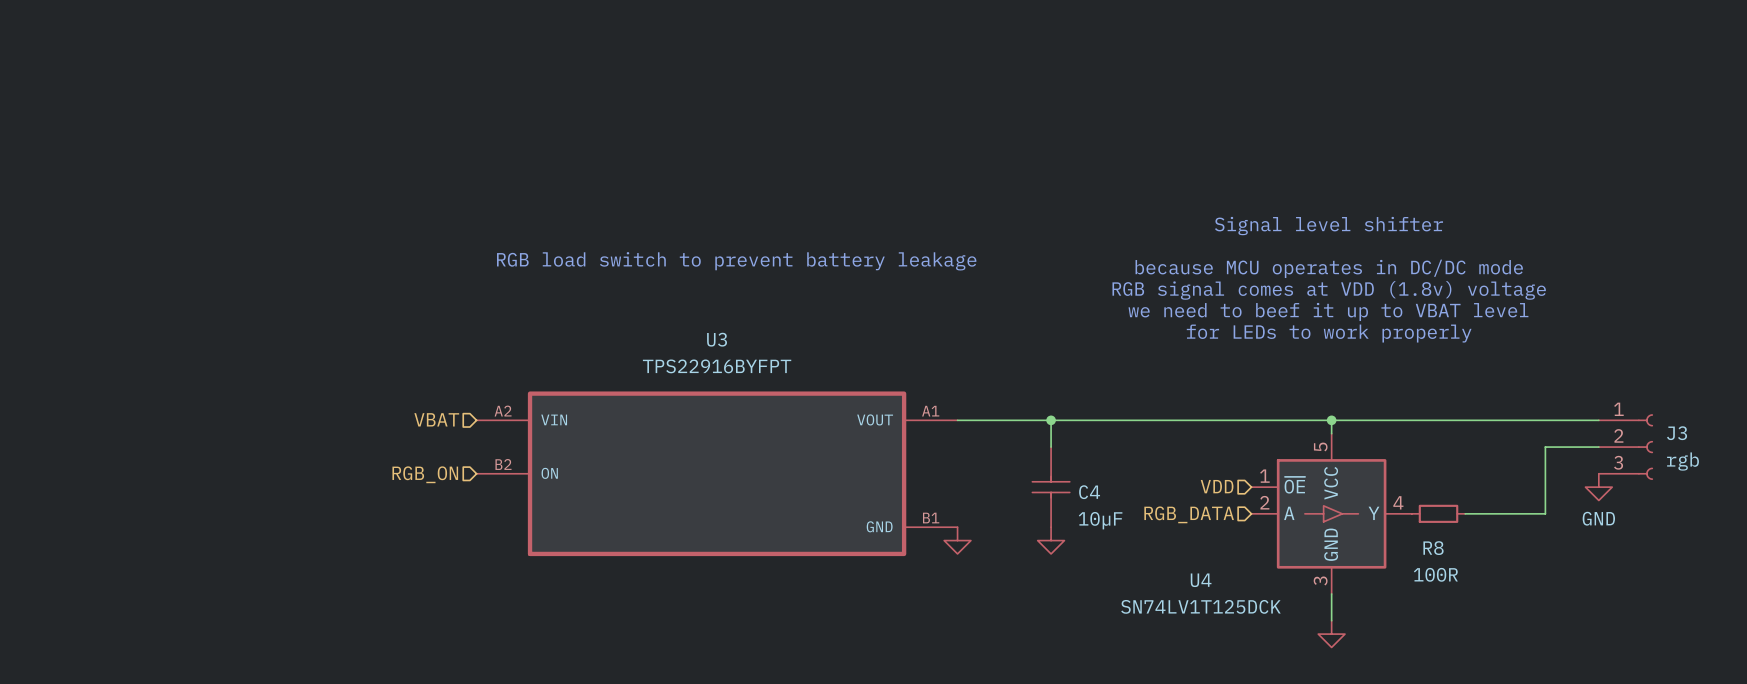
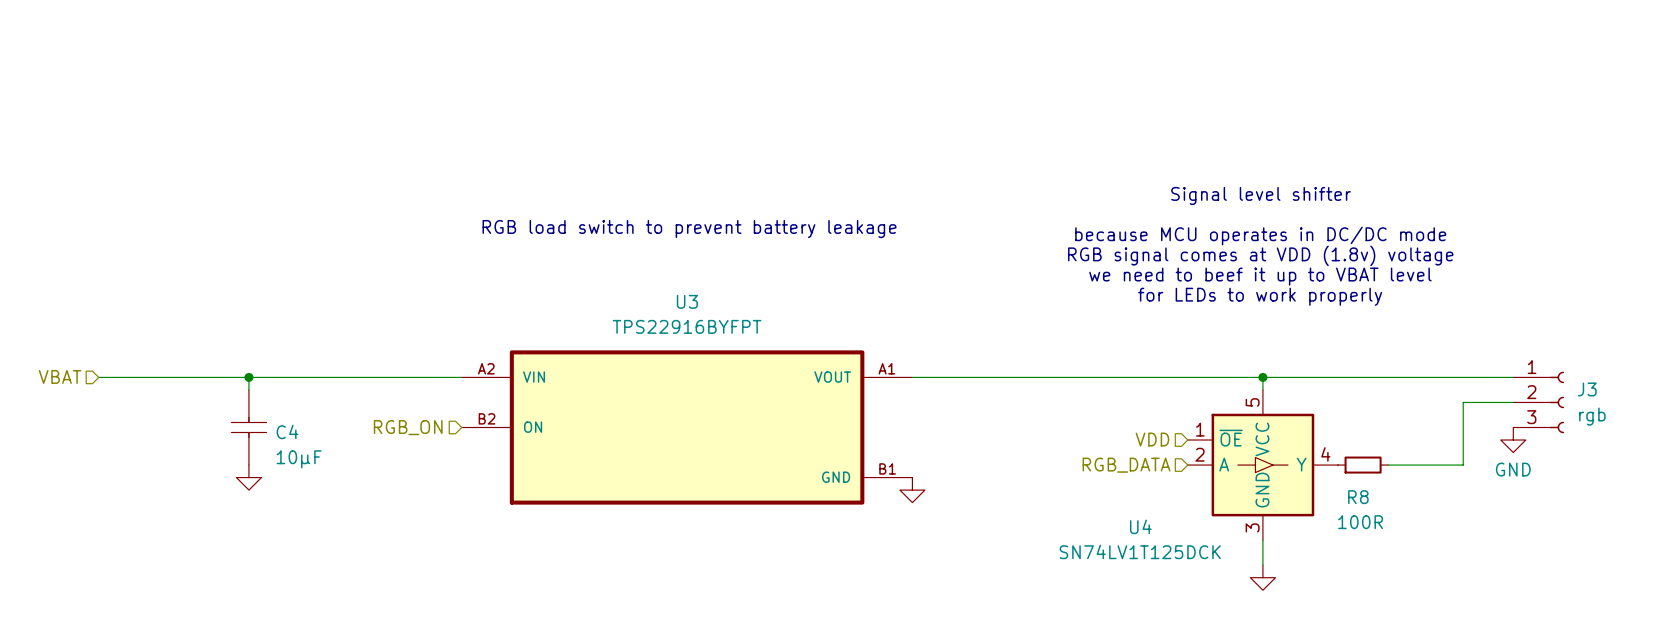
hierarchical label: none -> VBAT (60, 376)
hierarchical label: VBAT (436, 419) -> none
wire: none -> (98, 377) (461, 377)
wire: none -> (248, 377) (248, 389)
junction: none -> (248, 377)
wire: (1051, 420) (1051, 447) -> none
junction: (1051, 420) -> none
C4 position: (1051, 487) -> (248, 427)
power symbol: none -> (248, 477)
power symbol: (1051, 540) -> none

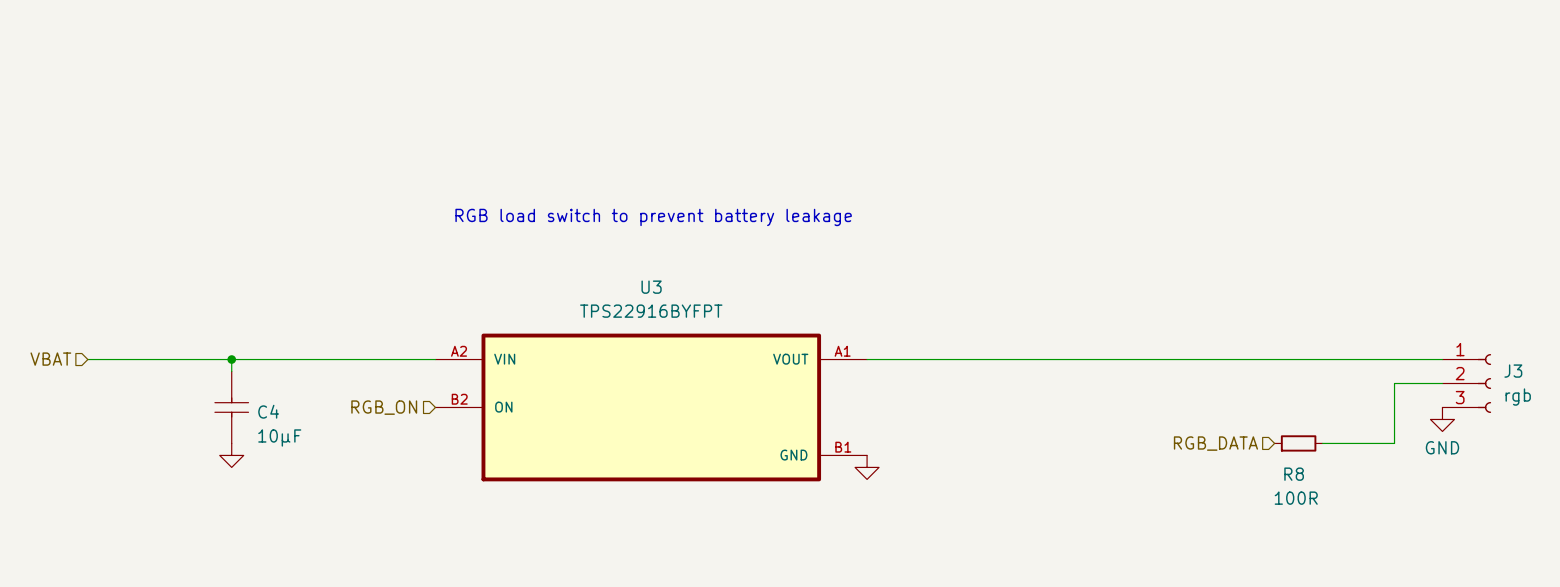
text: Signal level shifter (1261, 195) -> none
text: because MCU operates in DC/DC mode (1260, 236) -> none
text: RGB signal comes at VDD (1.8v) voltage (1260, 255) -> none
text: we need to beef it up to VBAT level (1260, 276) -> none
text: for LEDs to work properly (1260, 296) -> none
wire: (1262, 377) (1262, 389) -> none
junction: (1262, 377) -> none
hierarchical label: VDD (1152, 439) -> none
hierarchical label position: RGB_DATA (1126, 465) -> RGB_DATA (1215, 443)
U4: SN74LV1T125DCK (1262, 465) -> none
wire: (1262, 540) (1262, 565) -> none
power symbol: (1262, 577) -> none

